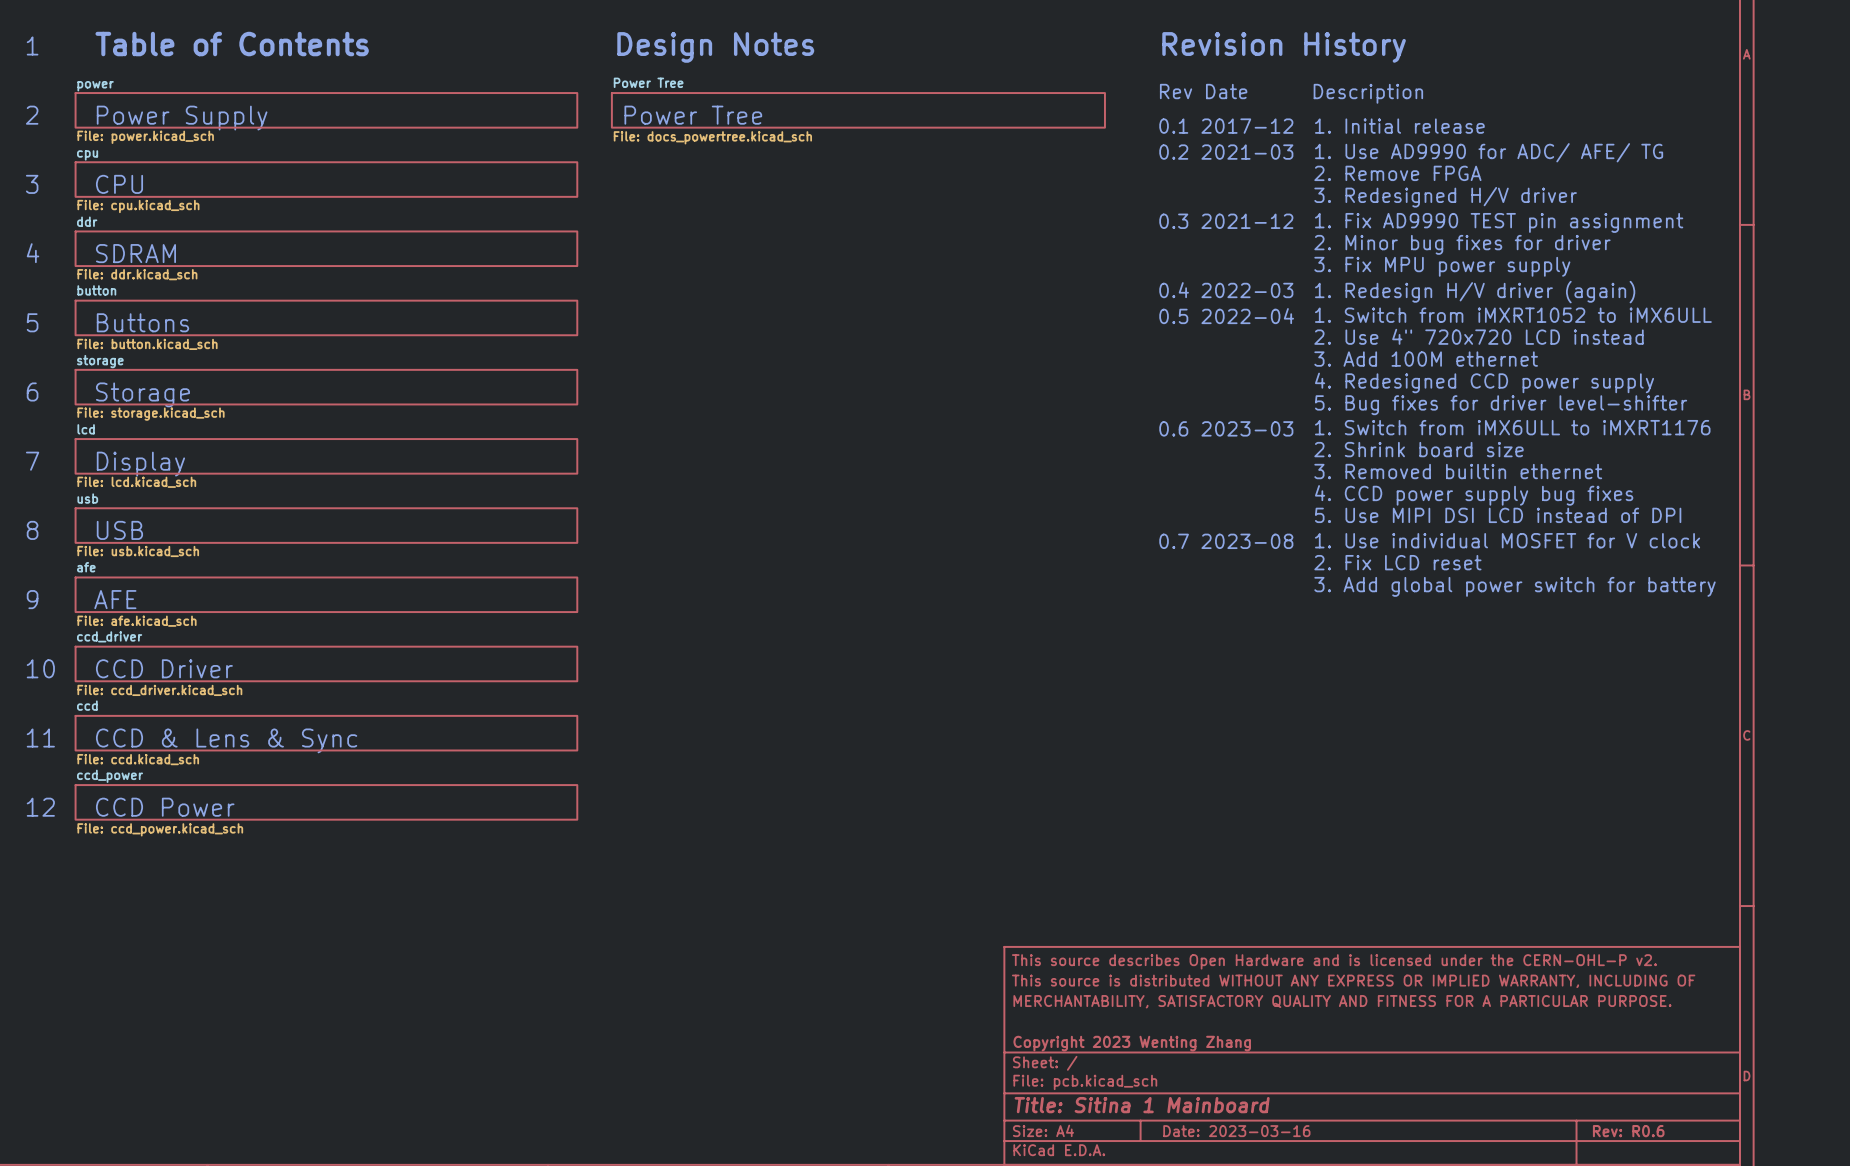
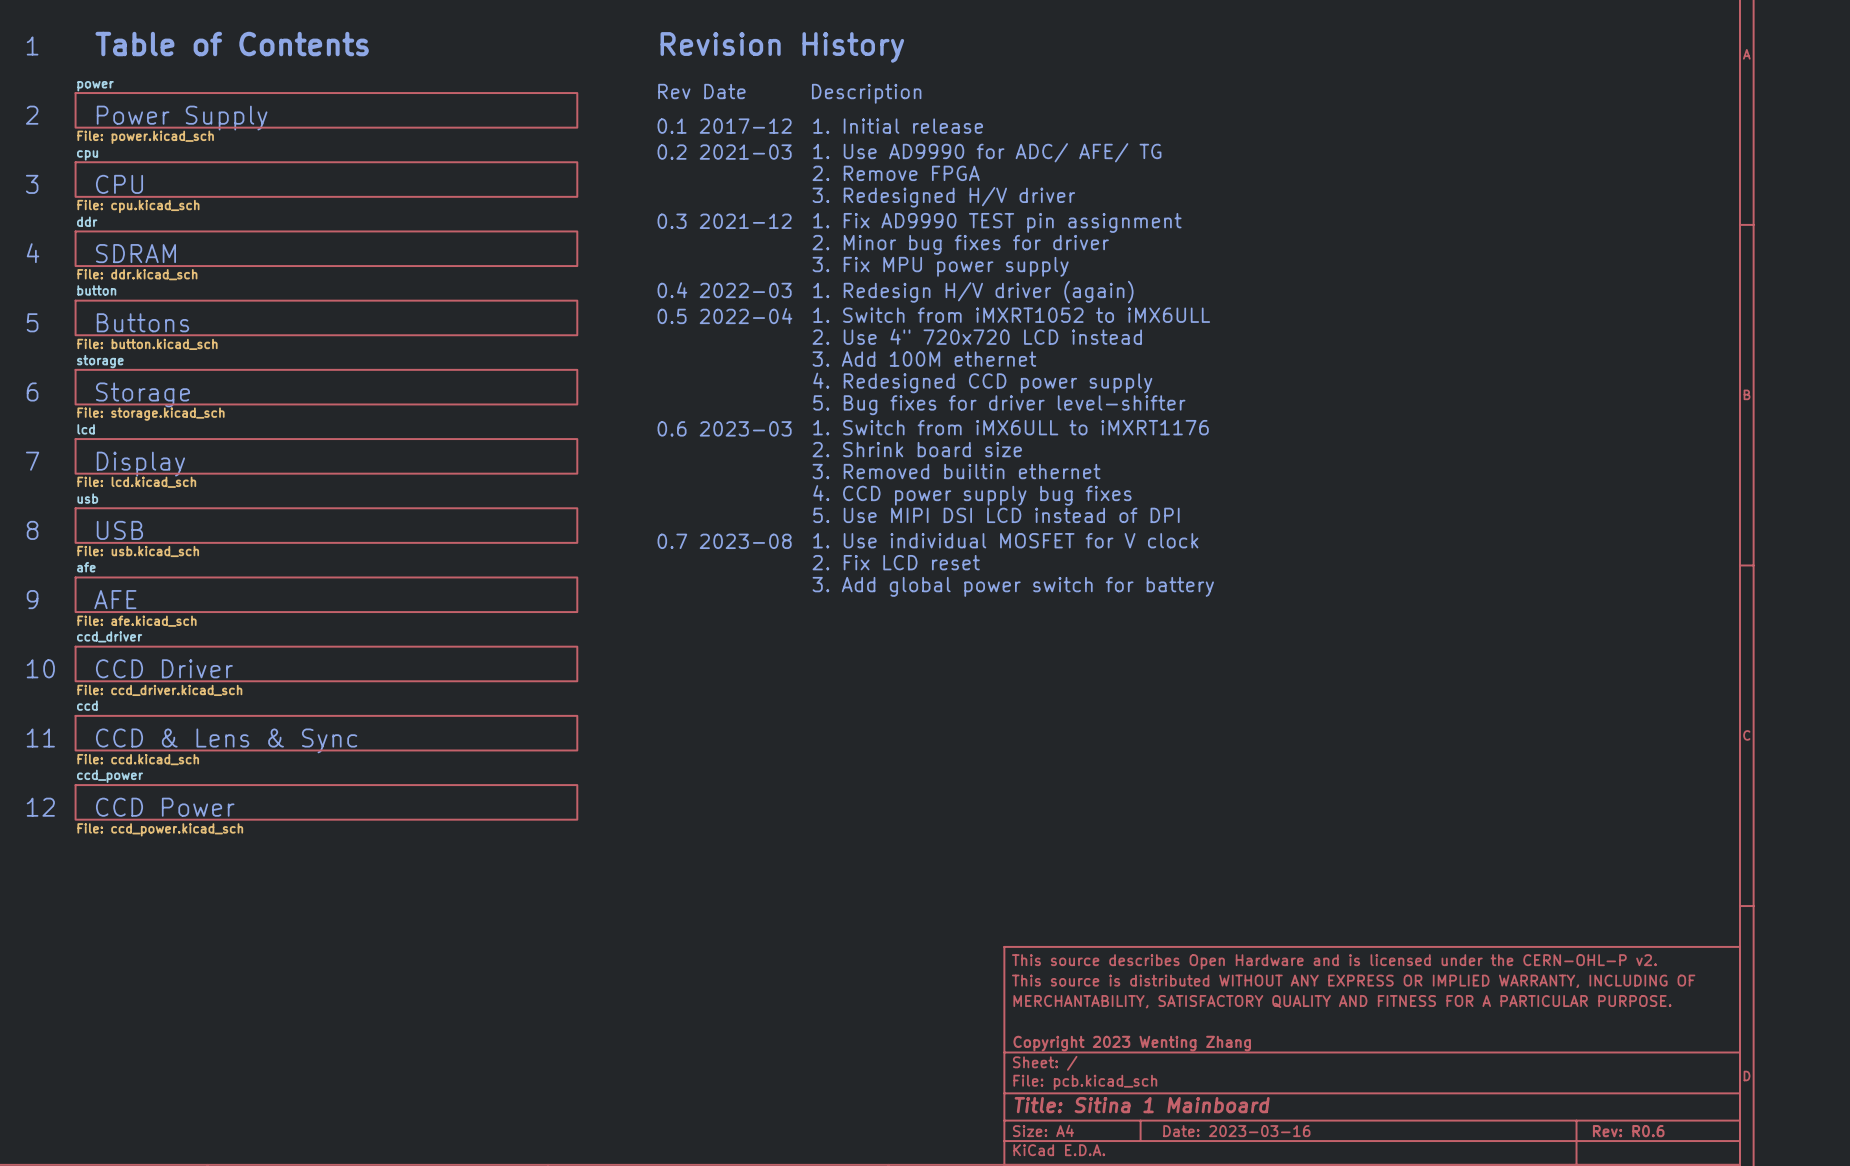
text: Design Notes (715, 47) -> none
text: none -> Revision History (782, 47)
text: Revision History (1284, 47) -> none
text: none -> Rev Date Description (789, 93)
text: Rev Date Description (1291, 93) -> none
sheet Power Tree: File: docs_powertree.kicad_sch (858, 110) -> none
text: Power Tree (693, 115) -> none
text: none -> 0.1 2017-12 (724, 126)
text: none -> 1. Initial release (898, 126)
text: 0.1 2017-12 (1226, 126) -> none
text: 1. Initial release (1399, 126) -> none
text: none -> 0.2 2021-03 (724, 152)
text: none -> 1. Use AD9990 for ADC/ AFE/ TG (987, 152)
text: 0.2 2021-03 (1226, 152) -> none
text: 1. Use AD9990 for ADC/ AFE/ TG (1489, 152) -> none
text: none -> 2. Remove FPGA (896, 173)
text: 2. Remove FPGA (1397, 173) -> none
text: none -> 3. Redesigned H/V driver (943, 197)
text: 3. Redesigned H/V driver (1445, 197) -> none
text: none -> 0.3 2021-12 (724, 221)
text: 0.3 2021-12 (1226, 221) -> none
text: none -> 1. Fix AD9990 TEST pin assignment (997, 222)
text: 1. Fix AD9990 TEST pin assignment (1499, 222) -> none
text: none -> 2. Minor bug fixes for driver (960, 244)
text: 2. Minor bug fixes for driver (1462, 244) -> none
text: none -> 3. Fix MPU power supply (940, 266)
text: 3. Fix MPU power supply (1442, 266) -> none
text: none -> 0.4 2022-03 (724, 290)
text: 0.4 2022-03 (1226, 290) -> none
text: none -> 1. Redesign H/V driver (again) (973, 292)
text: 1. Redesign H/V driver (again) (1475, 292) -> none
text: none -> 1. Switch from iMXRT1052 to iMX6ULL (1011, 315)
text: 1. Switch from iMXRT1052 to iMX6ULL (1513, 315) -> none
text: none -> 0.5 2022-04 (724, 316)
text: 0.5 2022-04 (1226, 316) -> none
text: none -> 2. Use 4" 720x720 LCD instead (977, 336)
text: 2. Use 4" 720x720 LCD instead (1479, 336) -> none
text: none -> 3. Add 100M ethernet (924, 359)
text: 3. Add 100M ethernet (1426, 359) -> none
text: none -> 4. Redesigned CCD power supply (982, 382)
text: 4. Redesigned CCD power supply (1484, 382) -> none
text: none -> 5. Bug fixes for driver level-shifter (999, 405)
text: 5. Bug fixes for driver level-shifter (1501, 405) -> none
text: none -> 1. Switch from iMX6ULL to iMXRT1176 (1011, 427)
text: 1. Switch from iMX6ULL to iMXRT1176 (1512, 427) -> none
text: none -> 0.6 2023-03 (724, 428)
text: 0.6 2023-03 (1226, 428) -> none
text: none -> 2. Shrink board size (917, 449)
text: 2. Shrink board size (1419, 449) -> none
text: none -> 3. Removed builtin ethernet (956, 471)
text: 3. Removed builtin ethernet (1458, 471) -> none
text: none -> 4. CCD power supply bug fixes (972, 495)
text: 4. CCD power supply bug fixes (1474, 495) -> none
text: none -> 5. Use MIPI DSI LCD instead of DPI (996, 515)
text: 5. Use MIPI DSI LCD instead of DPI (1498, 515) -> none
text: none -> 1. Use individual MOSFET for V clock (1005, 540)
text: 1. Use individual MOSFET for V clock (1507, 540) -> none
text: none -> 0.7 2023-08 (724, 541)
text: 0.7 2023-08 (1226, 541) -> none
text: none -> 2. Fix LCD reset (896, 562)
text: 2. Fix LCD reset (1397, 562) -> none
text: none -> 3. Add global power switch for battery (1013, 586)
text: 3. Add global power switch for battery (1515, 586) -> none

